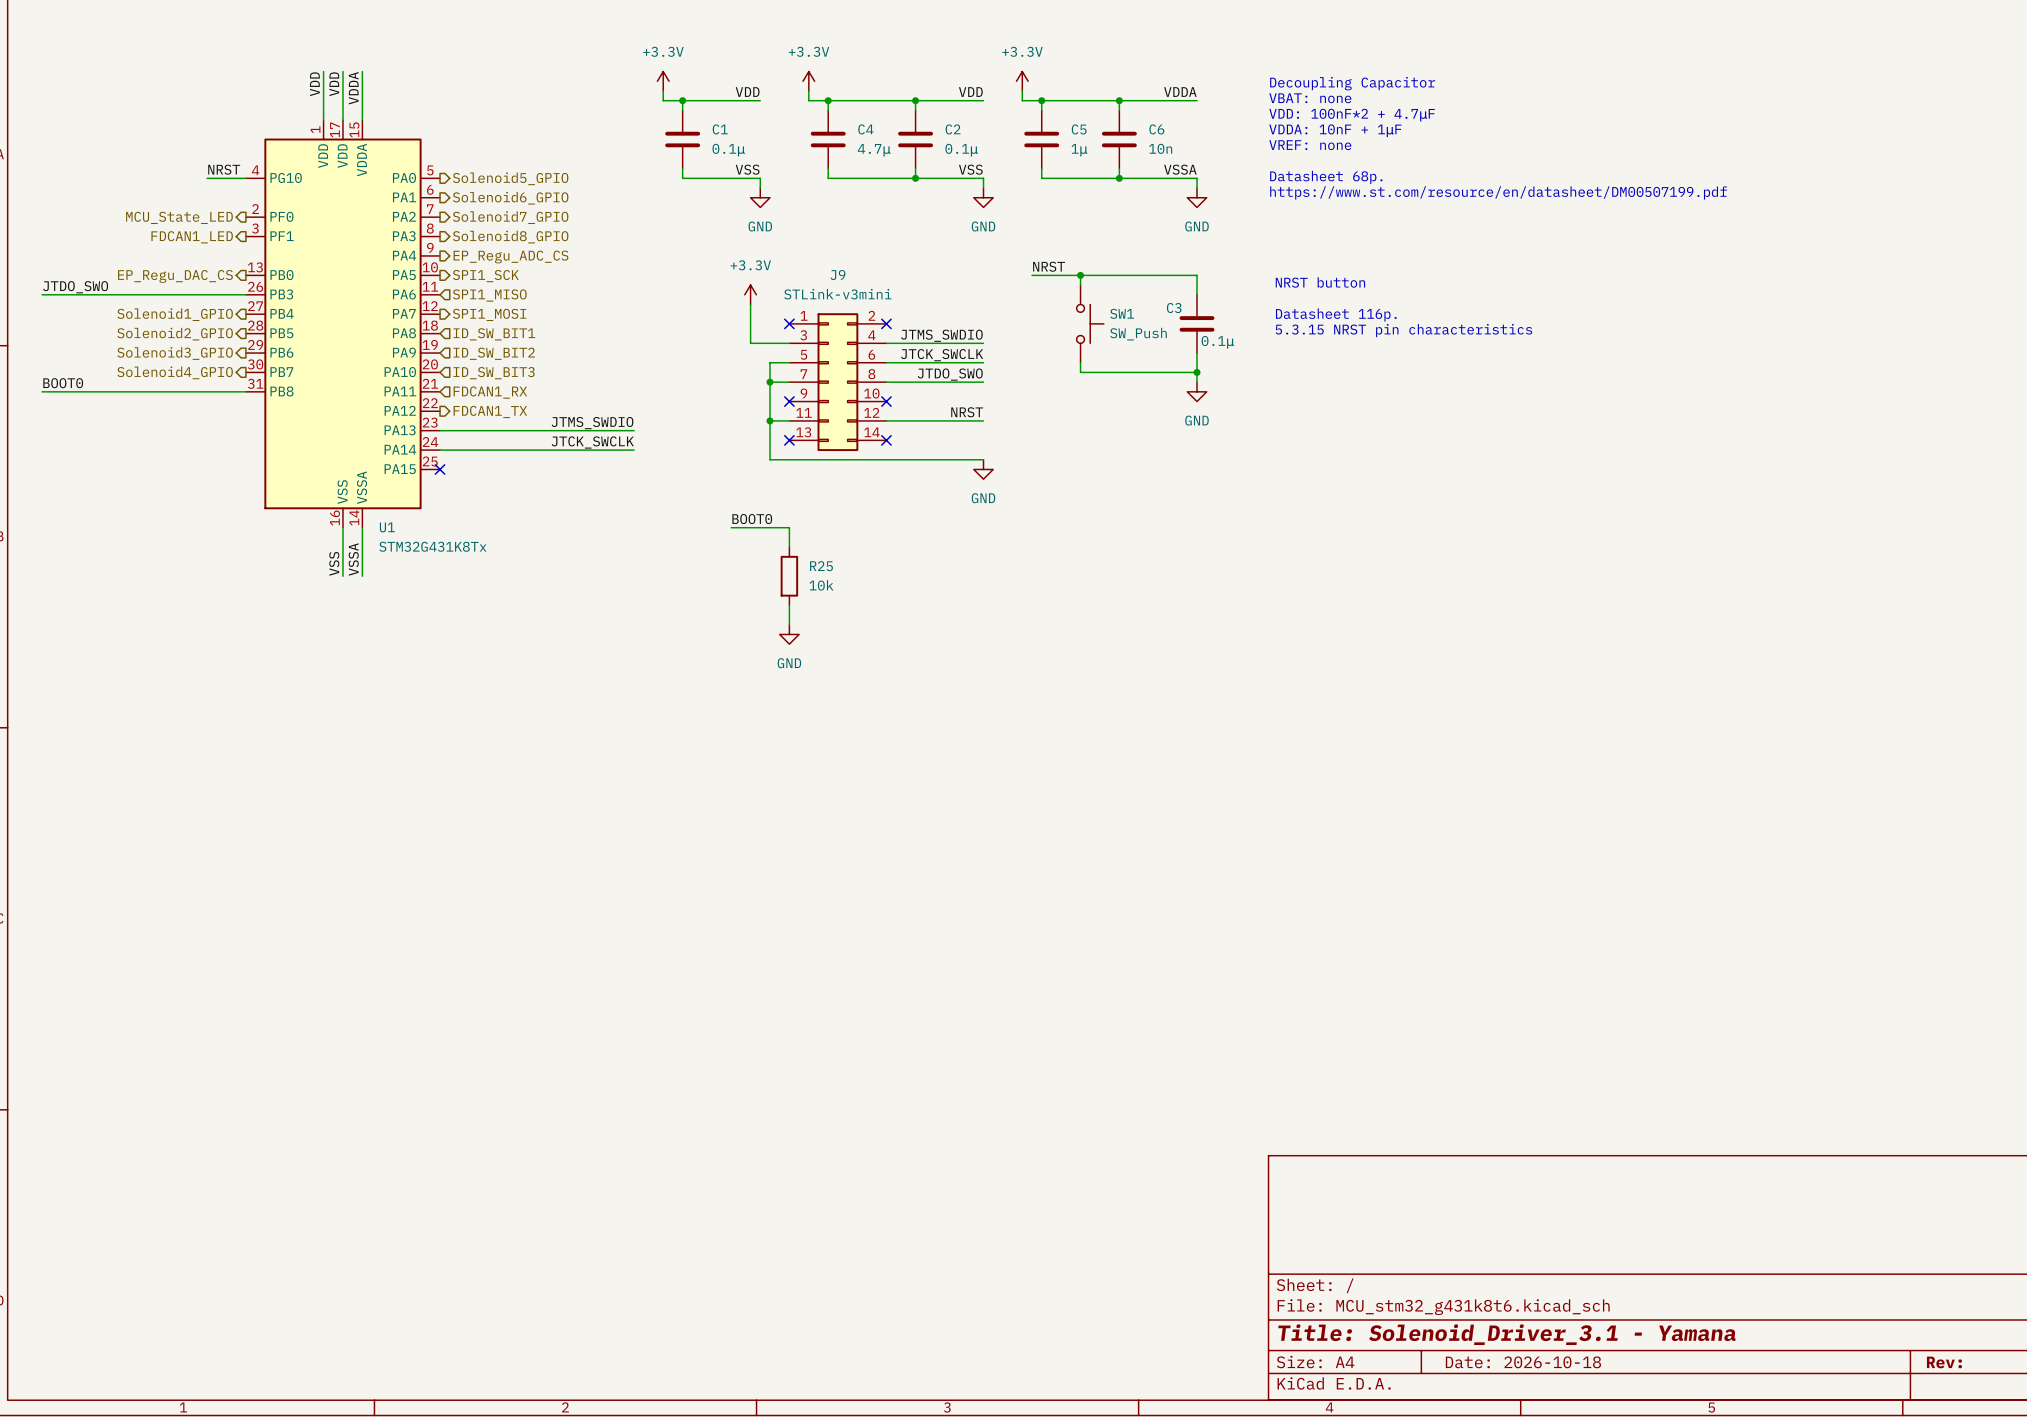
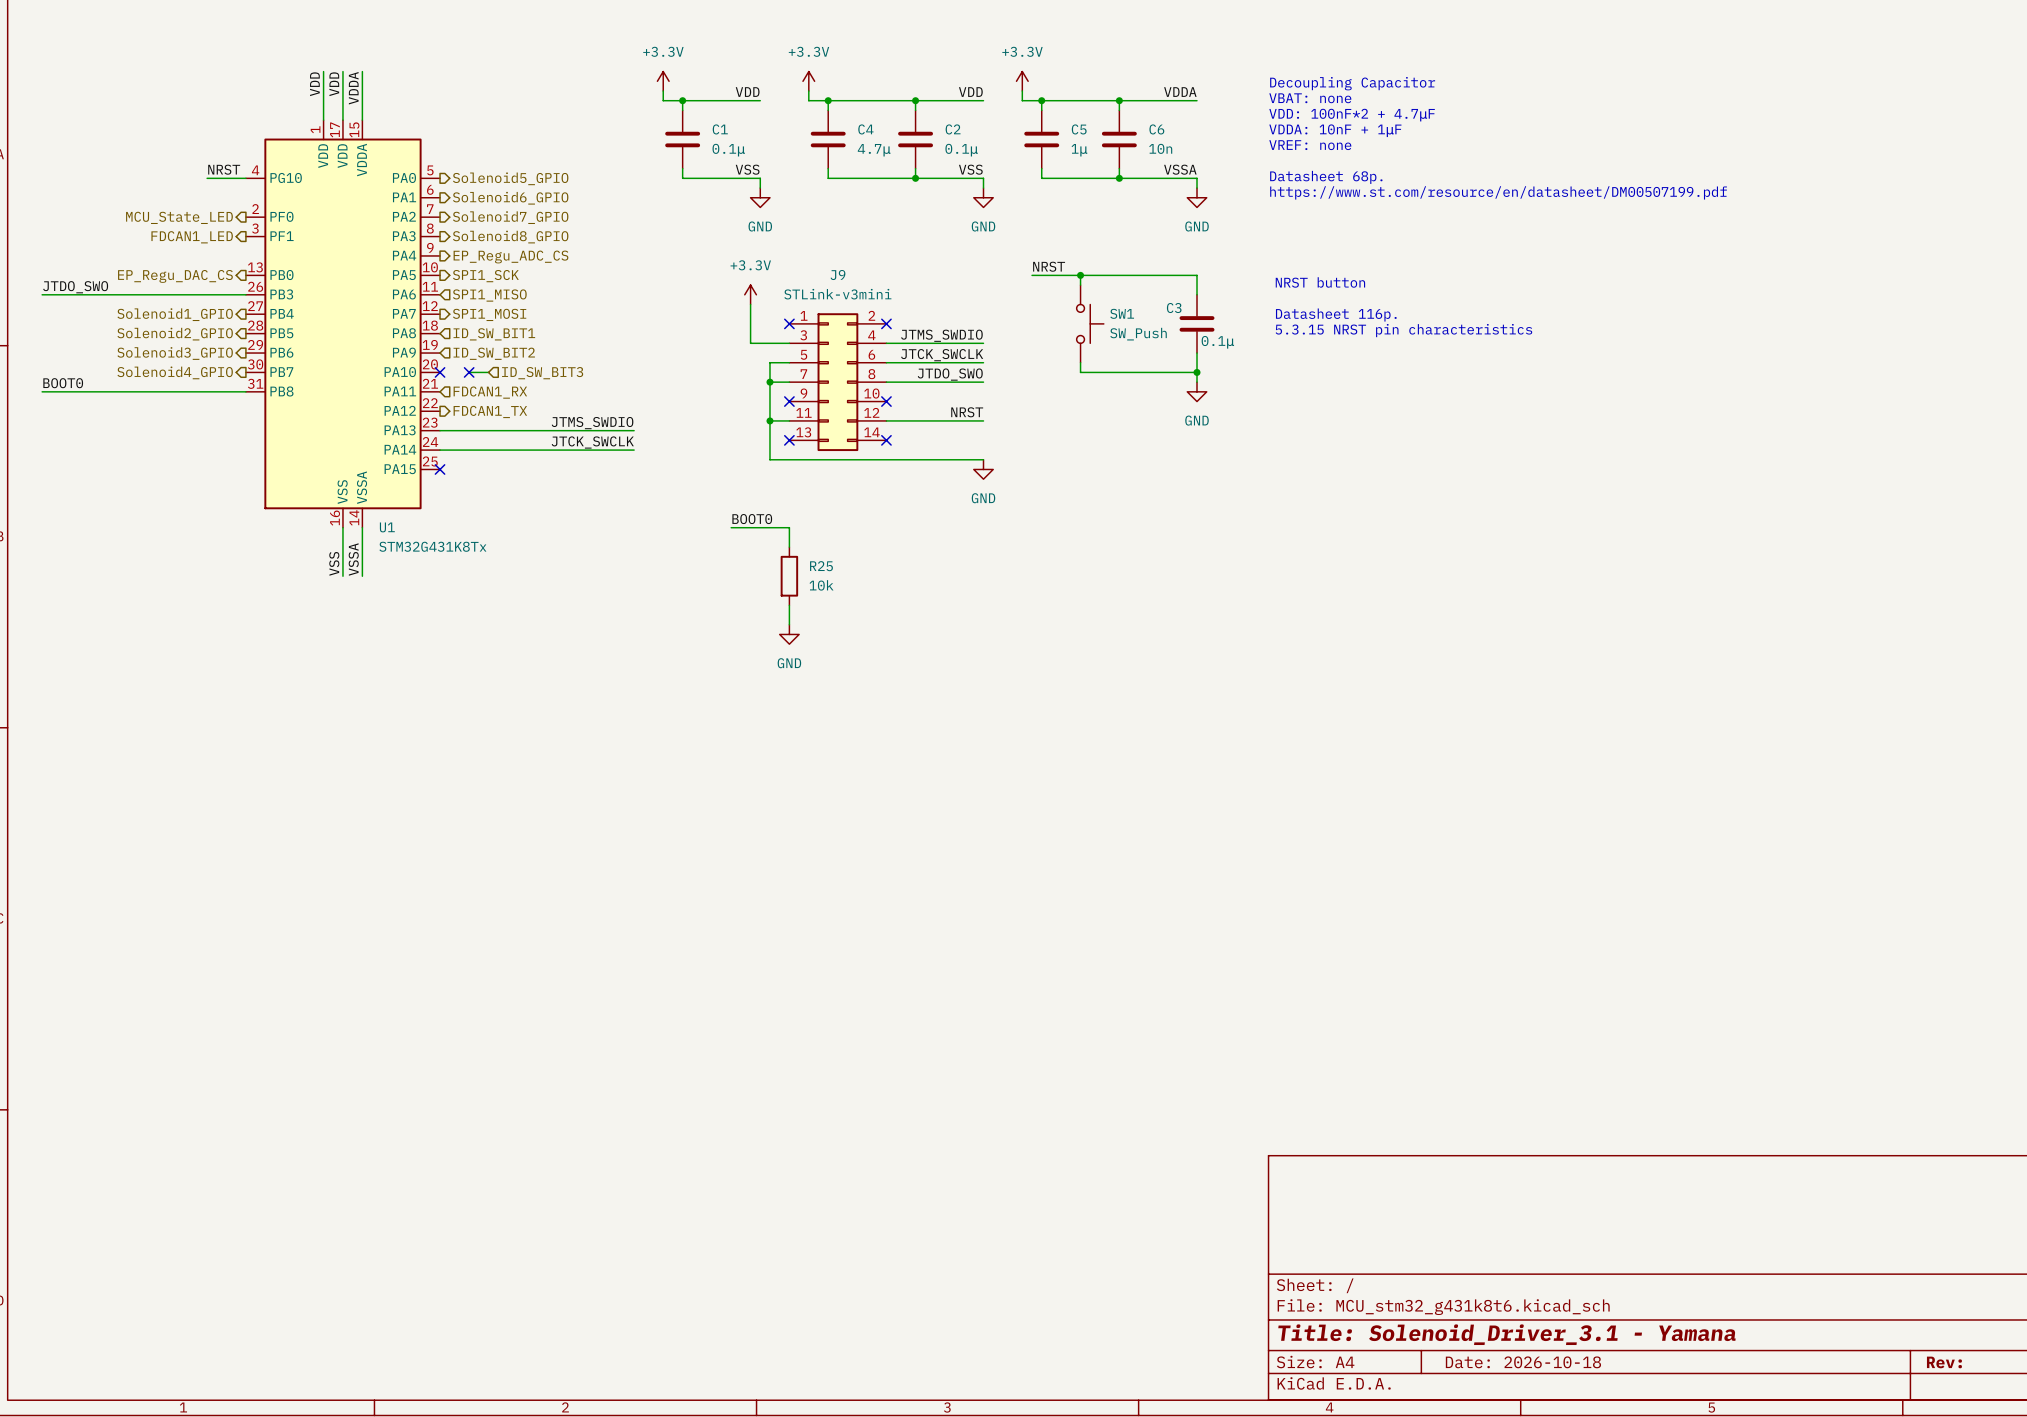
no-connect mark: none -> (440, 372)
wire: none -> (469, 372) (488, 372)
no-connect mark: none -> (469, 372)
hierarchical label position: ID_SW_BIT3 (494, 373) -> ID_SW_BIT3 (542, 373)

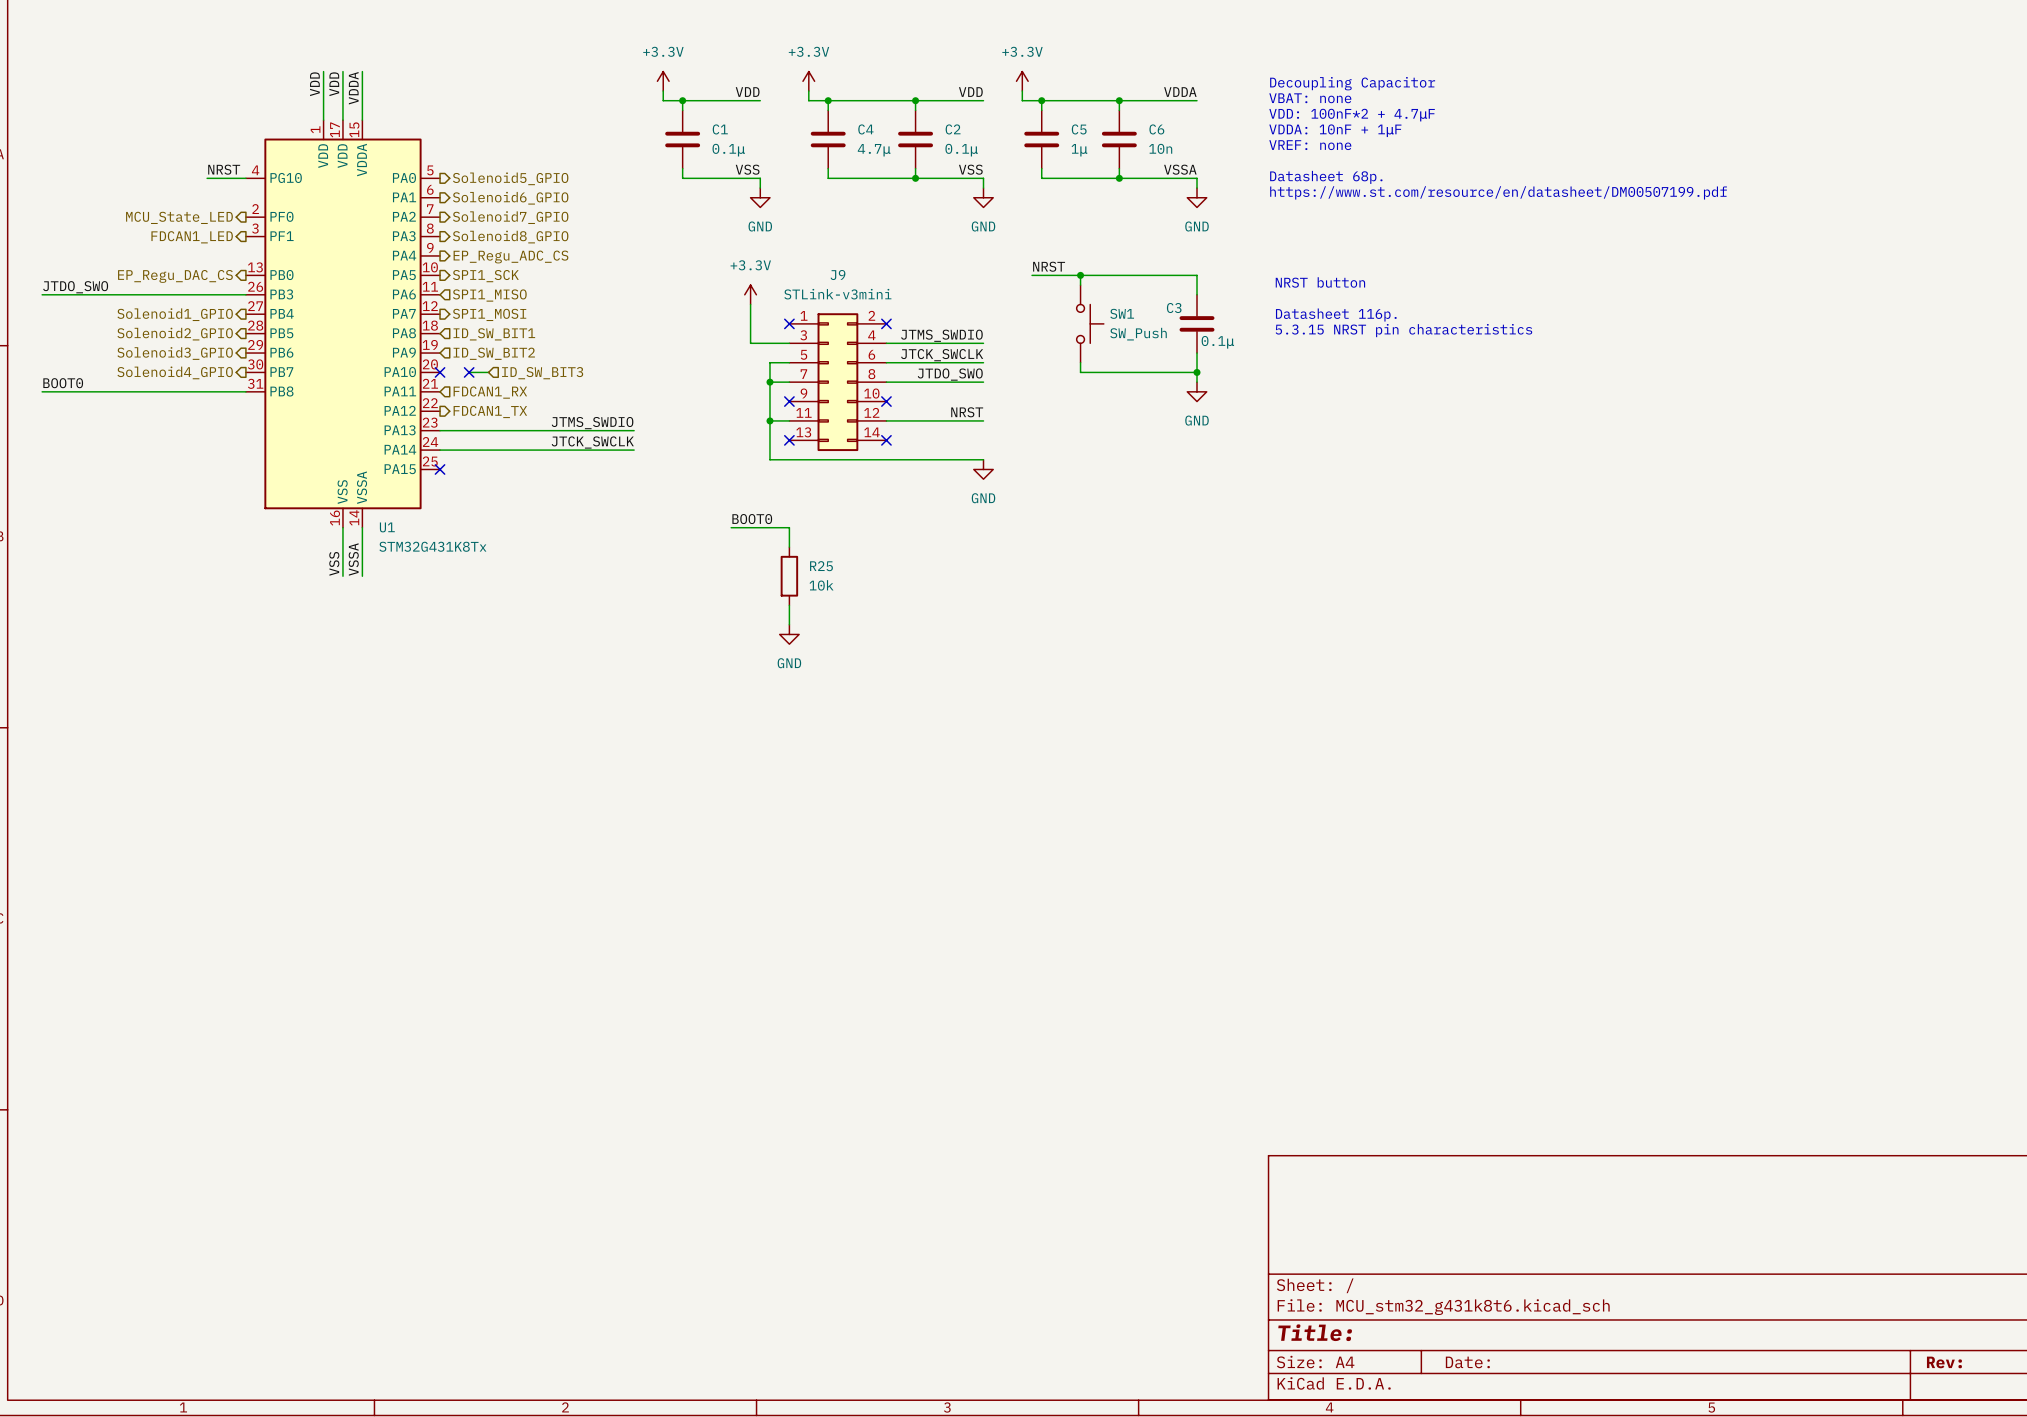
title block: Title: Solenoid_Driver_3.1 - Yamana (1506, 1334) -> Title: (1315, 1332)
title block: Date: 2026-10-18 (1523, 1362) -> Date: (1467, 1362)

